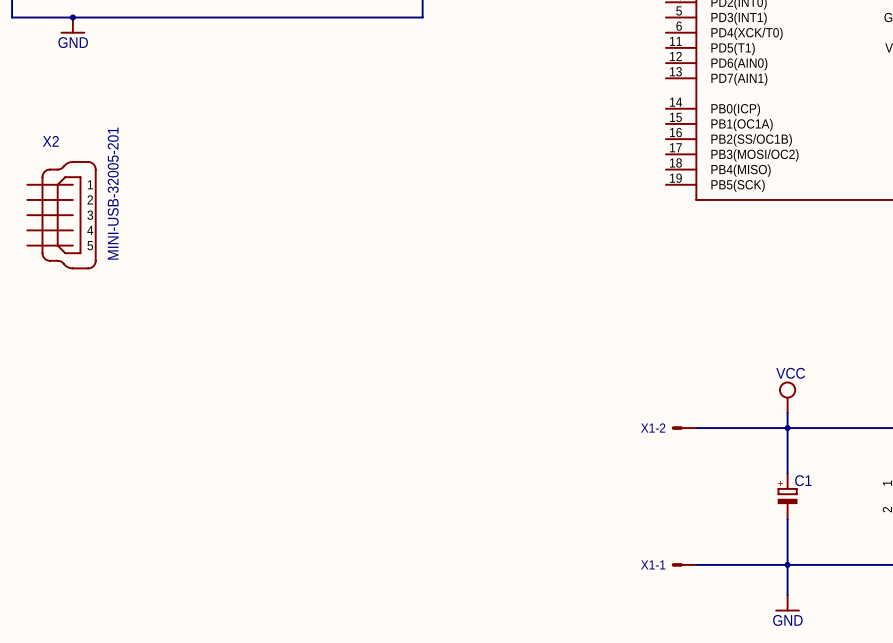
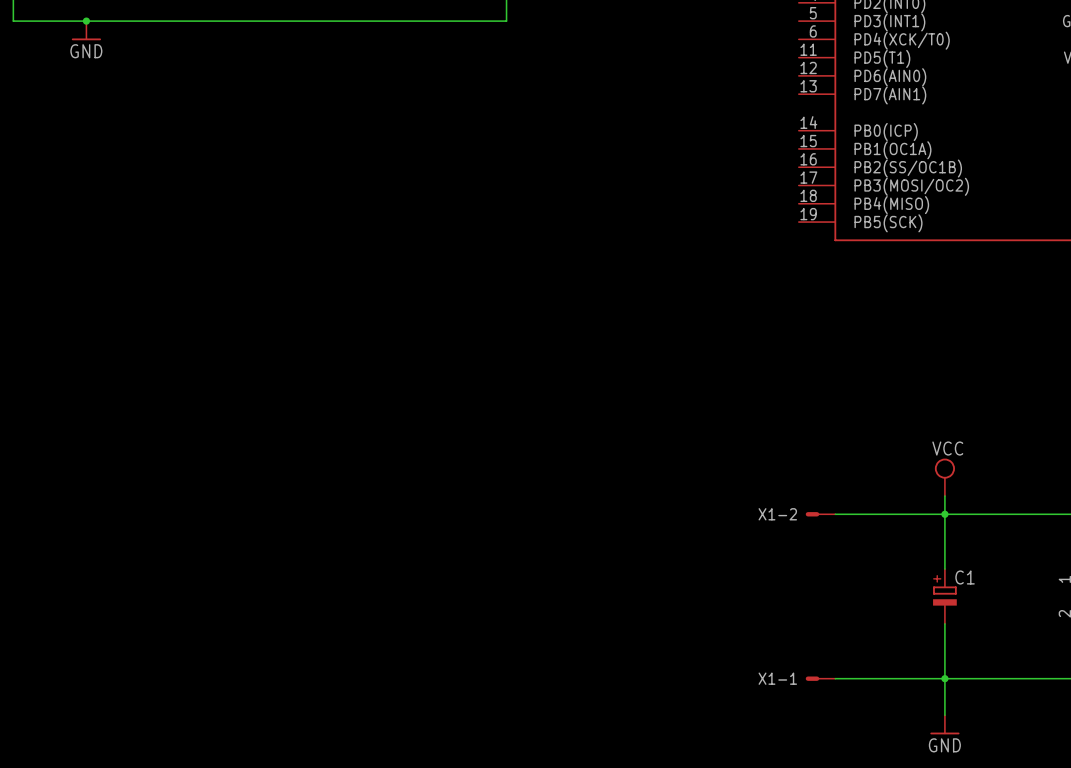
X2: MINI-USB-32005-201 (61, 215) -> none

